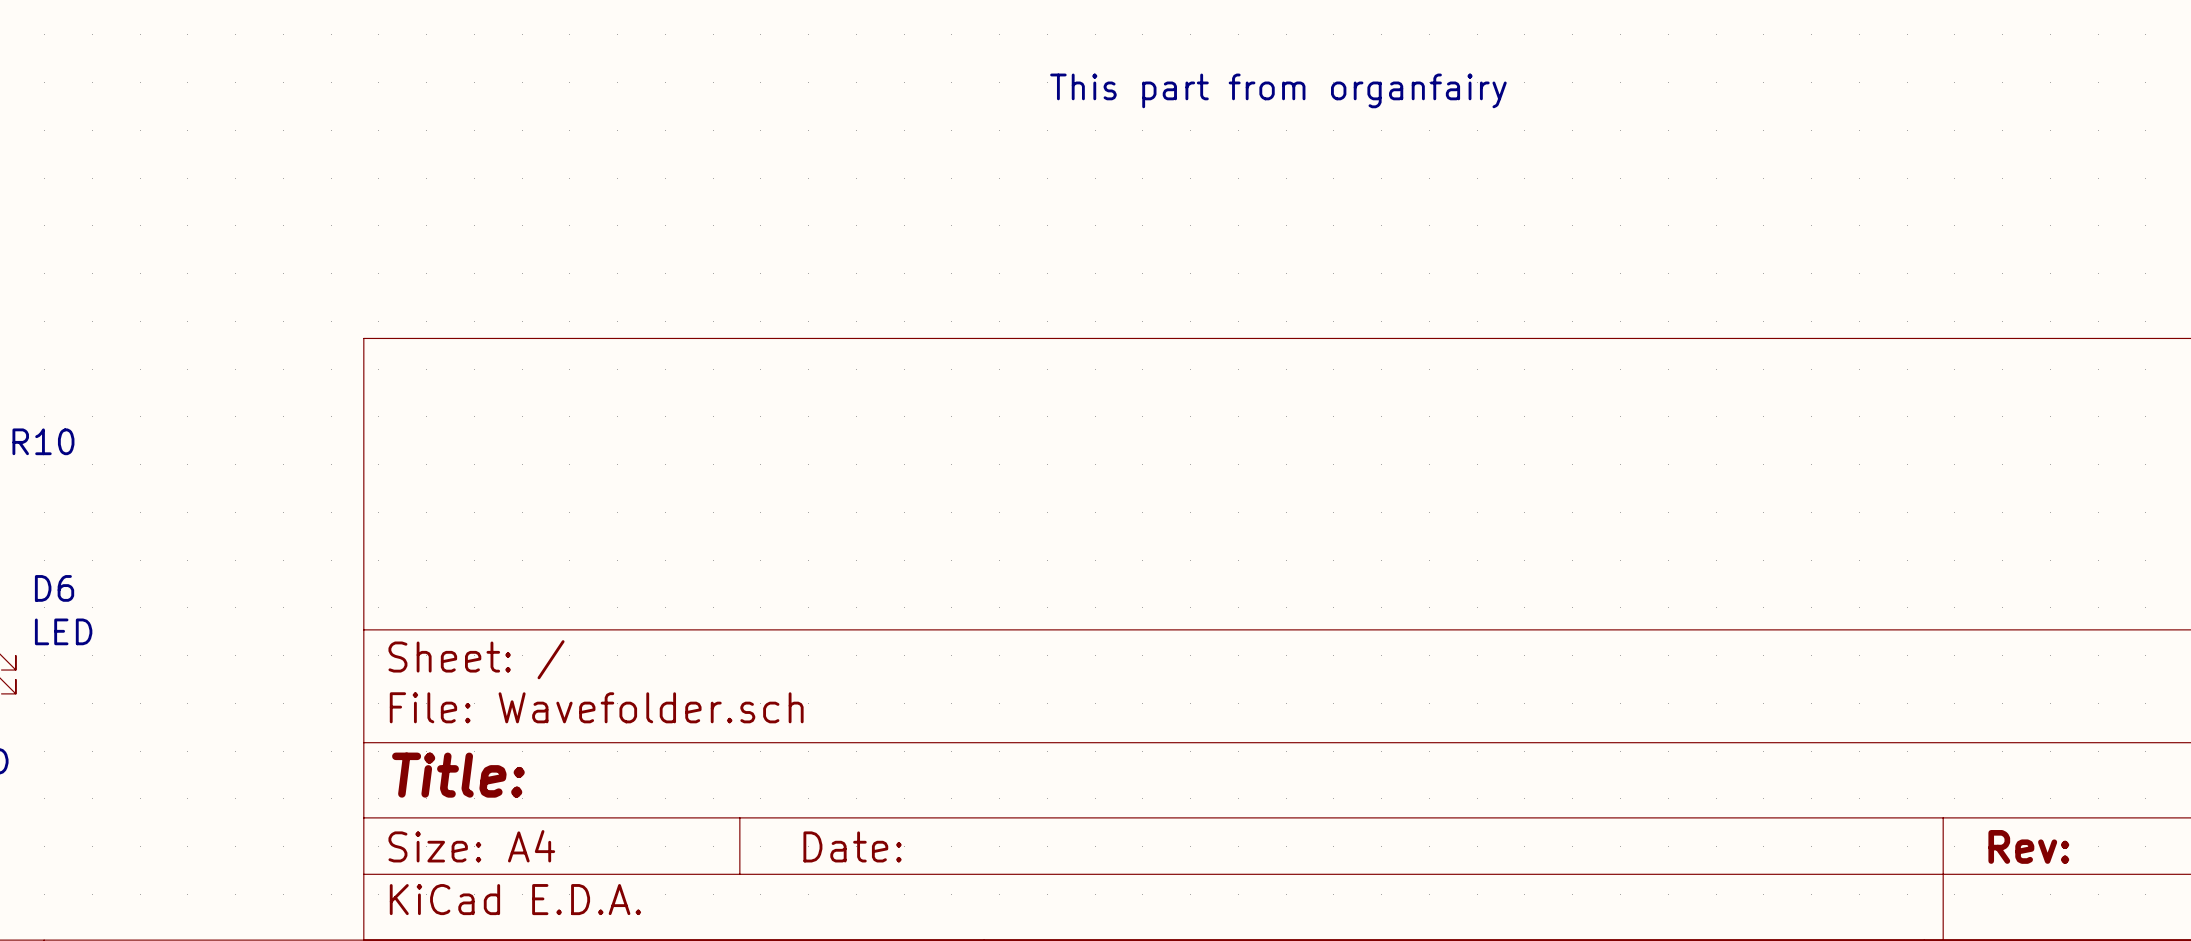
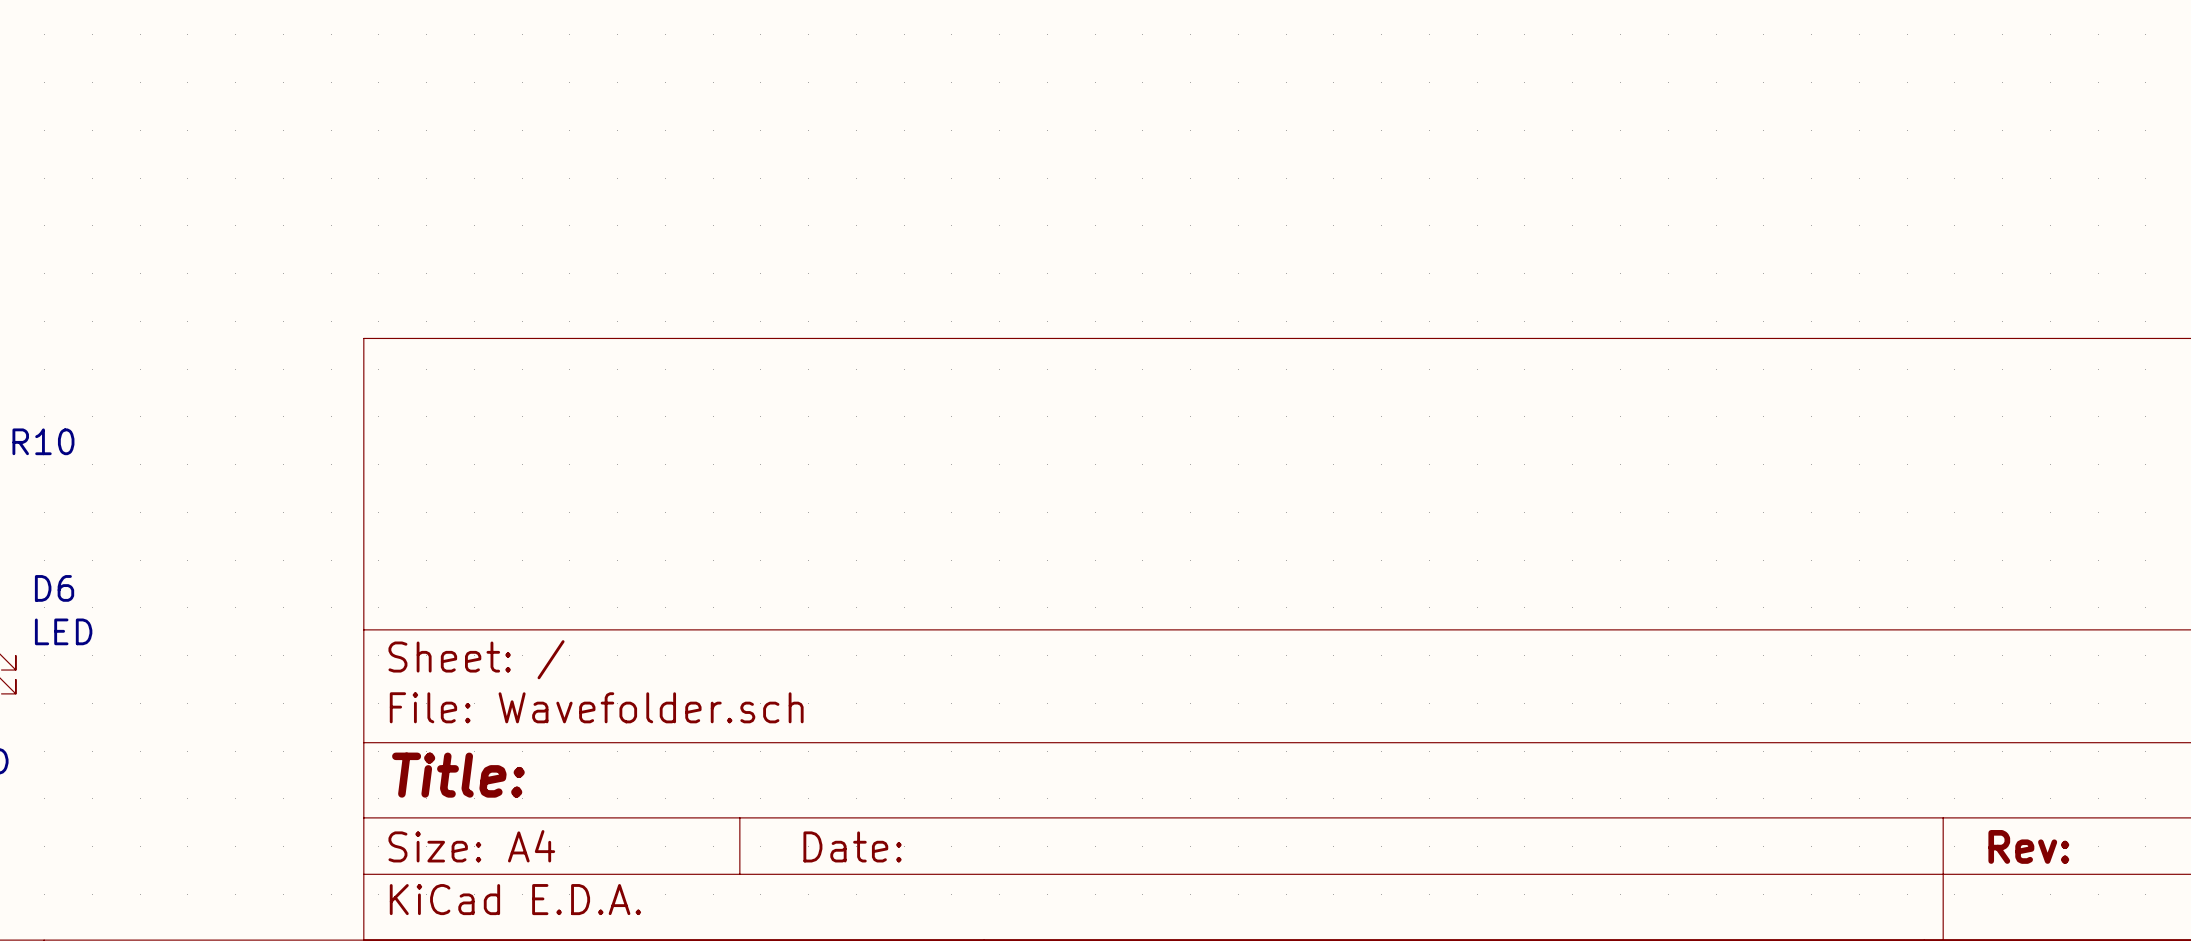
text: This part from organfairy (1278, 90) -> none

